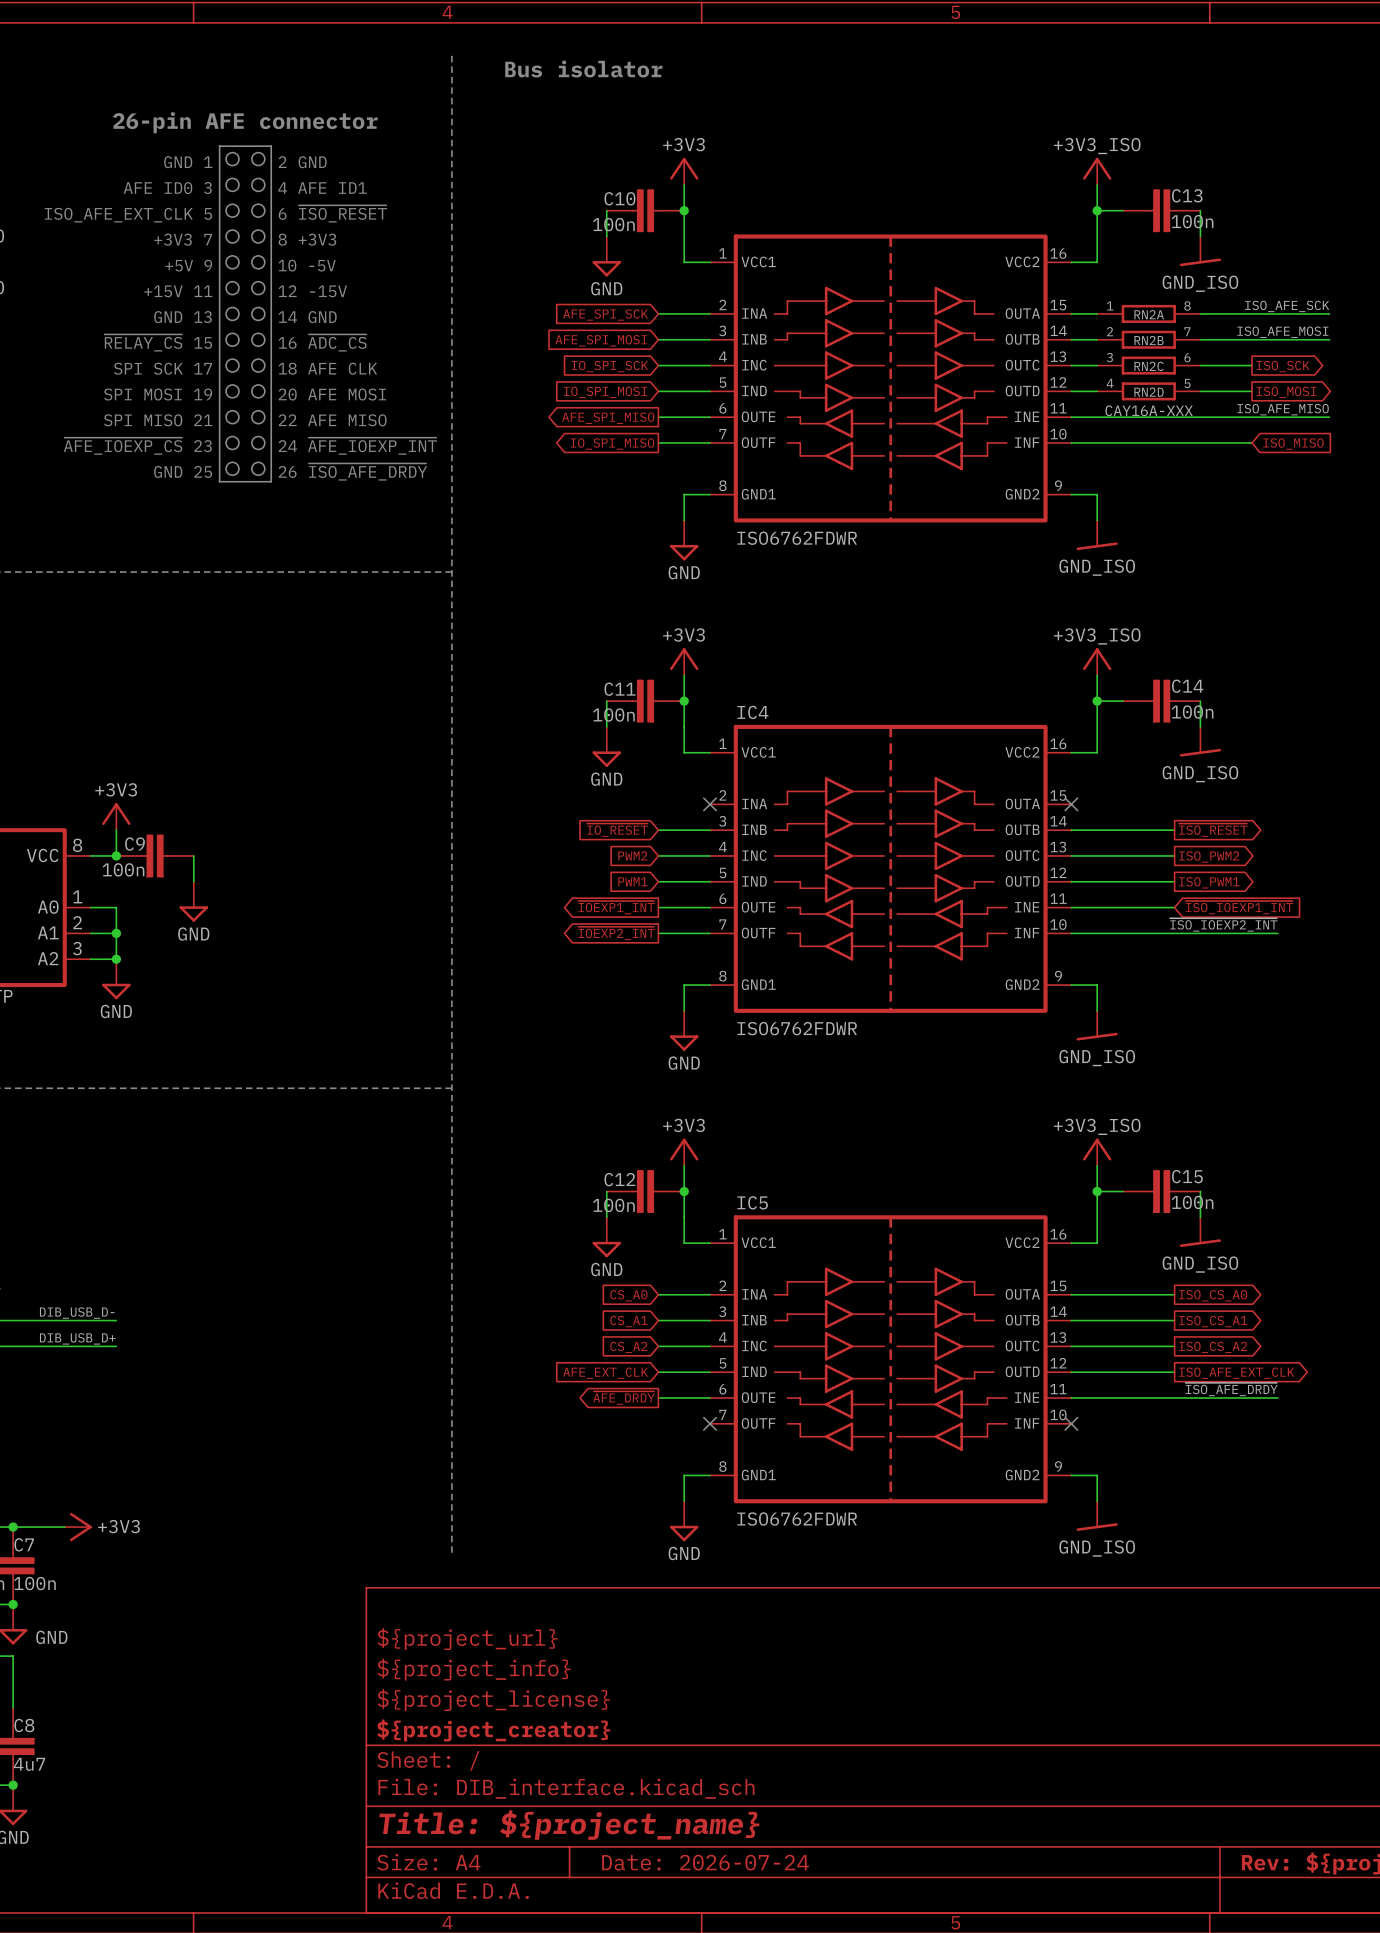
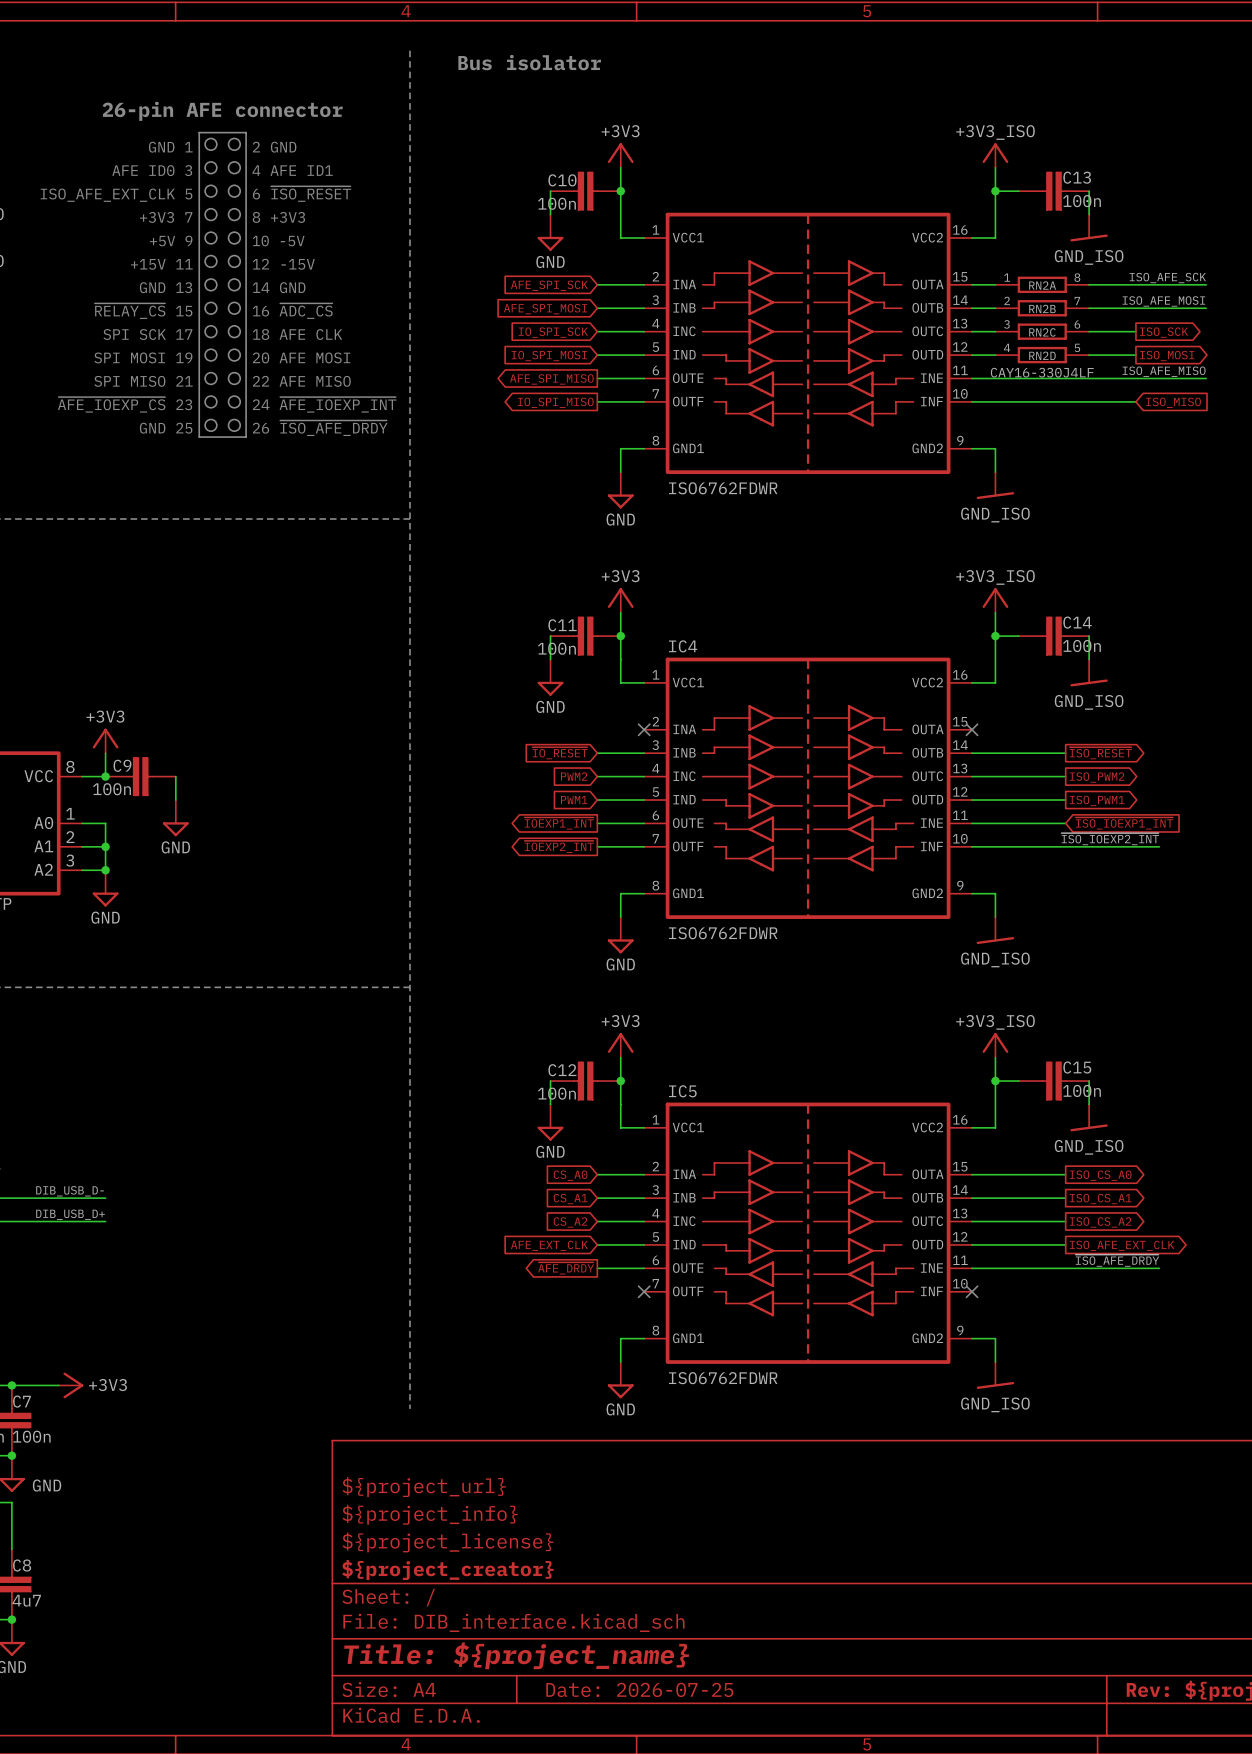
RN2D value: CAY16A-XXX (1149, 410) -> CAY16-330J4LF (1042, 372)
title block: Date: 2026-07-24 (705, 1862) -> Date: 2026-07-25 (639, 1689)

